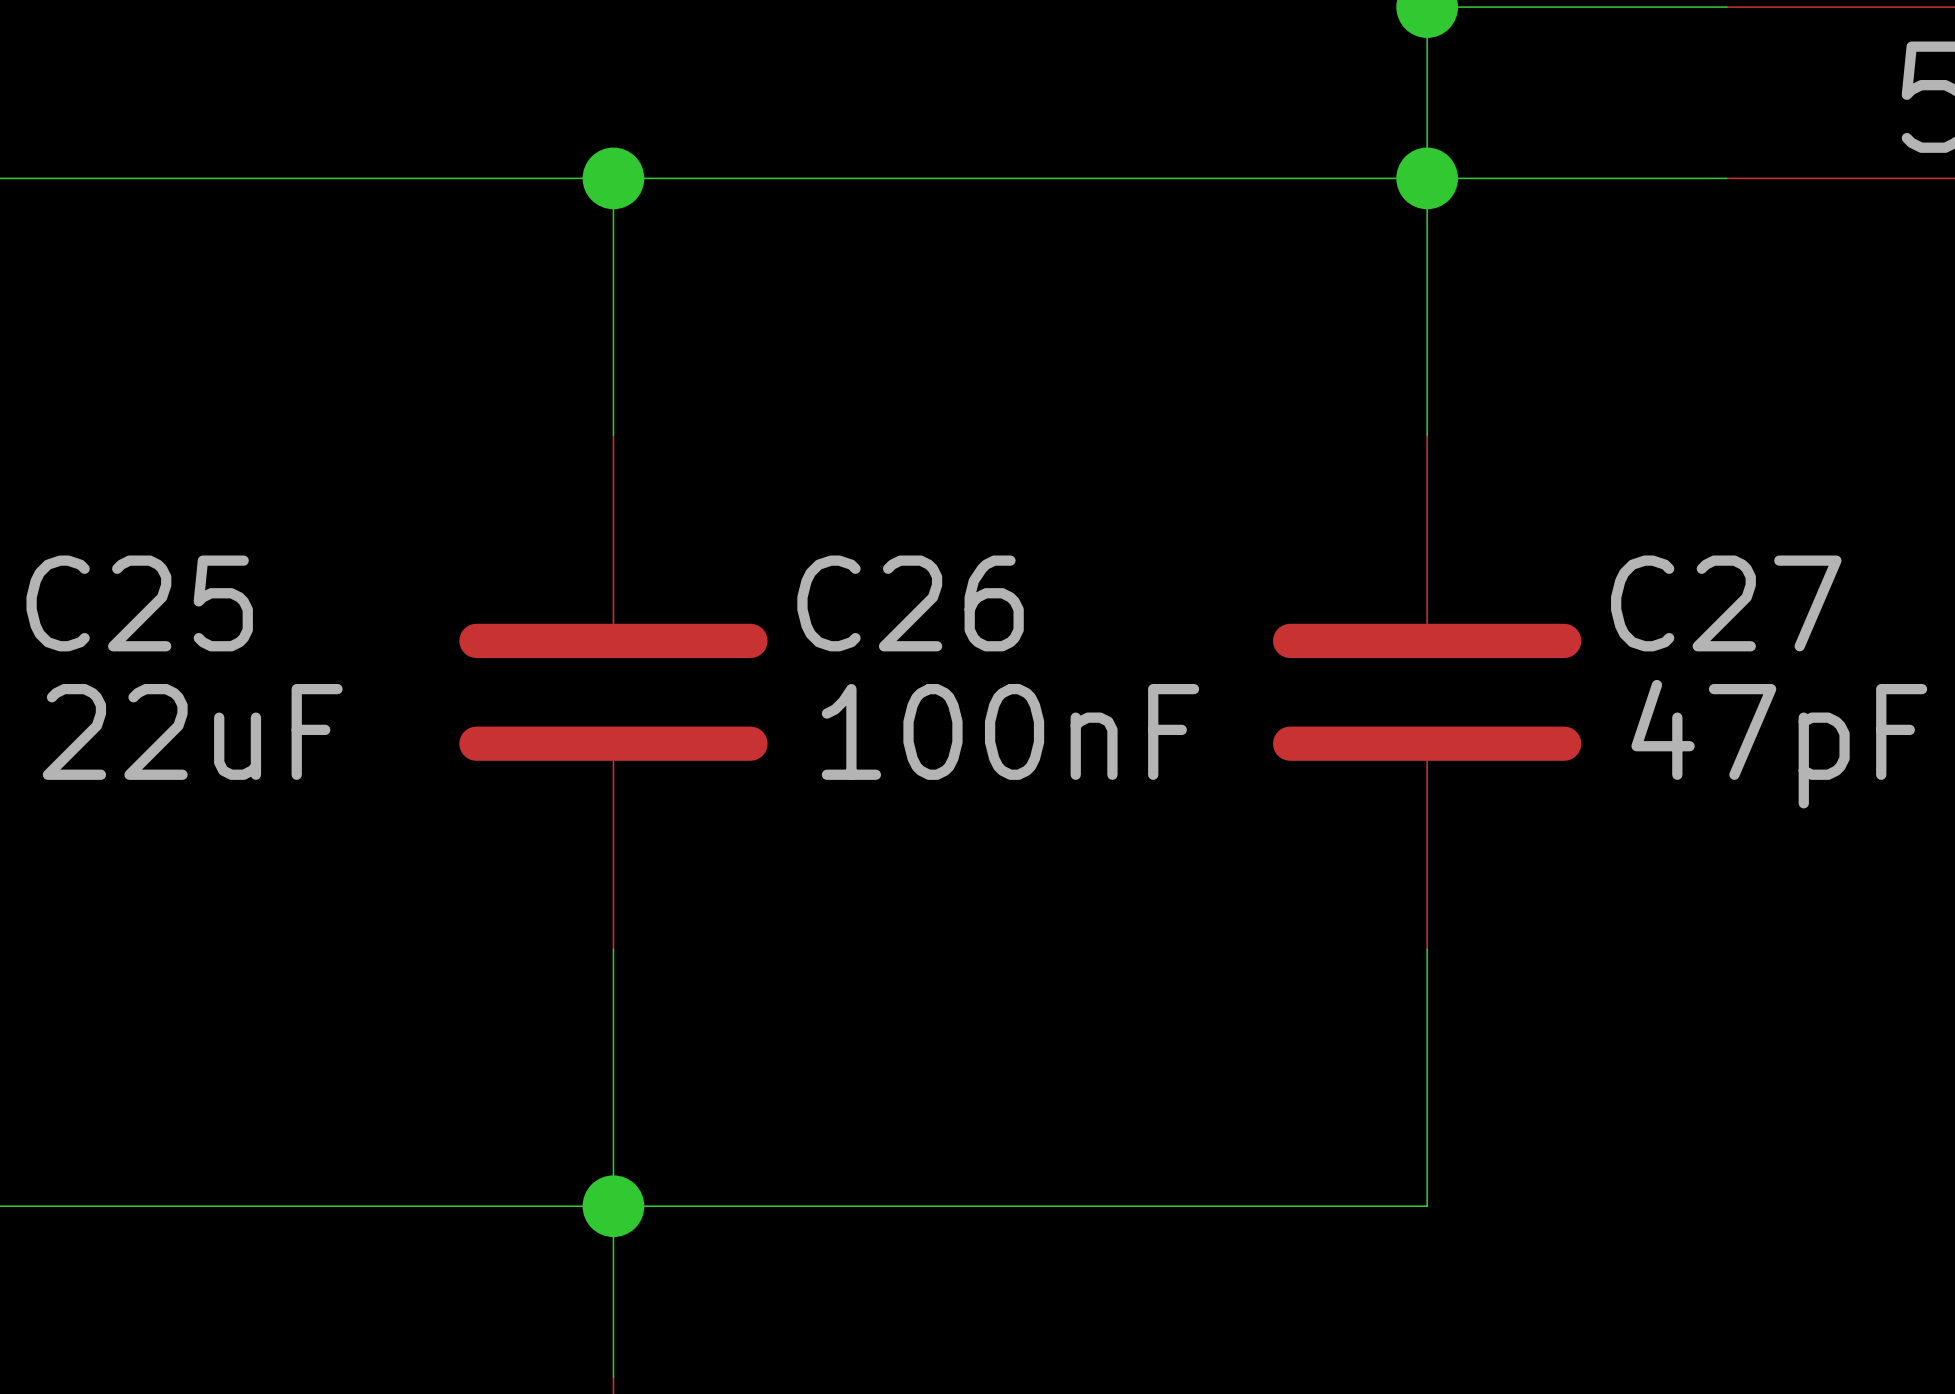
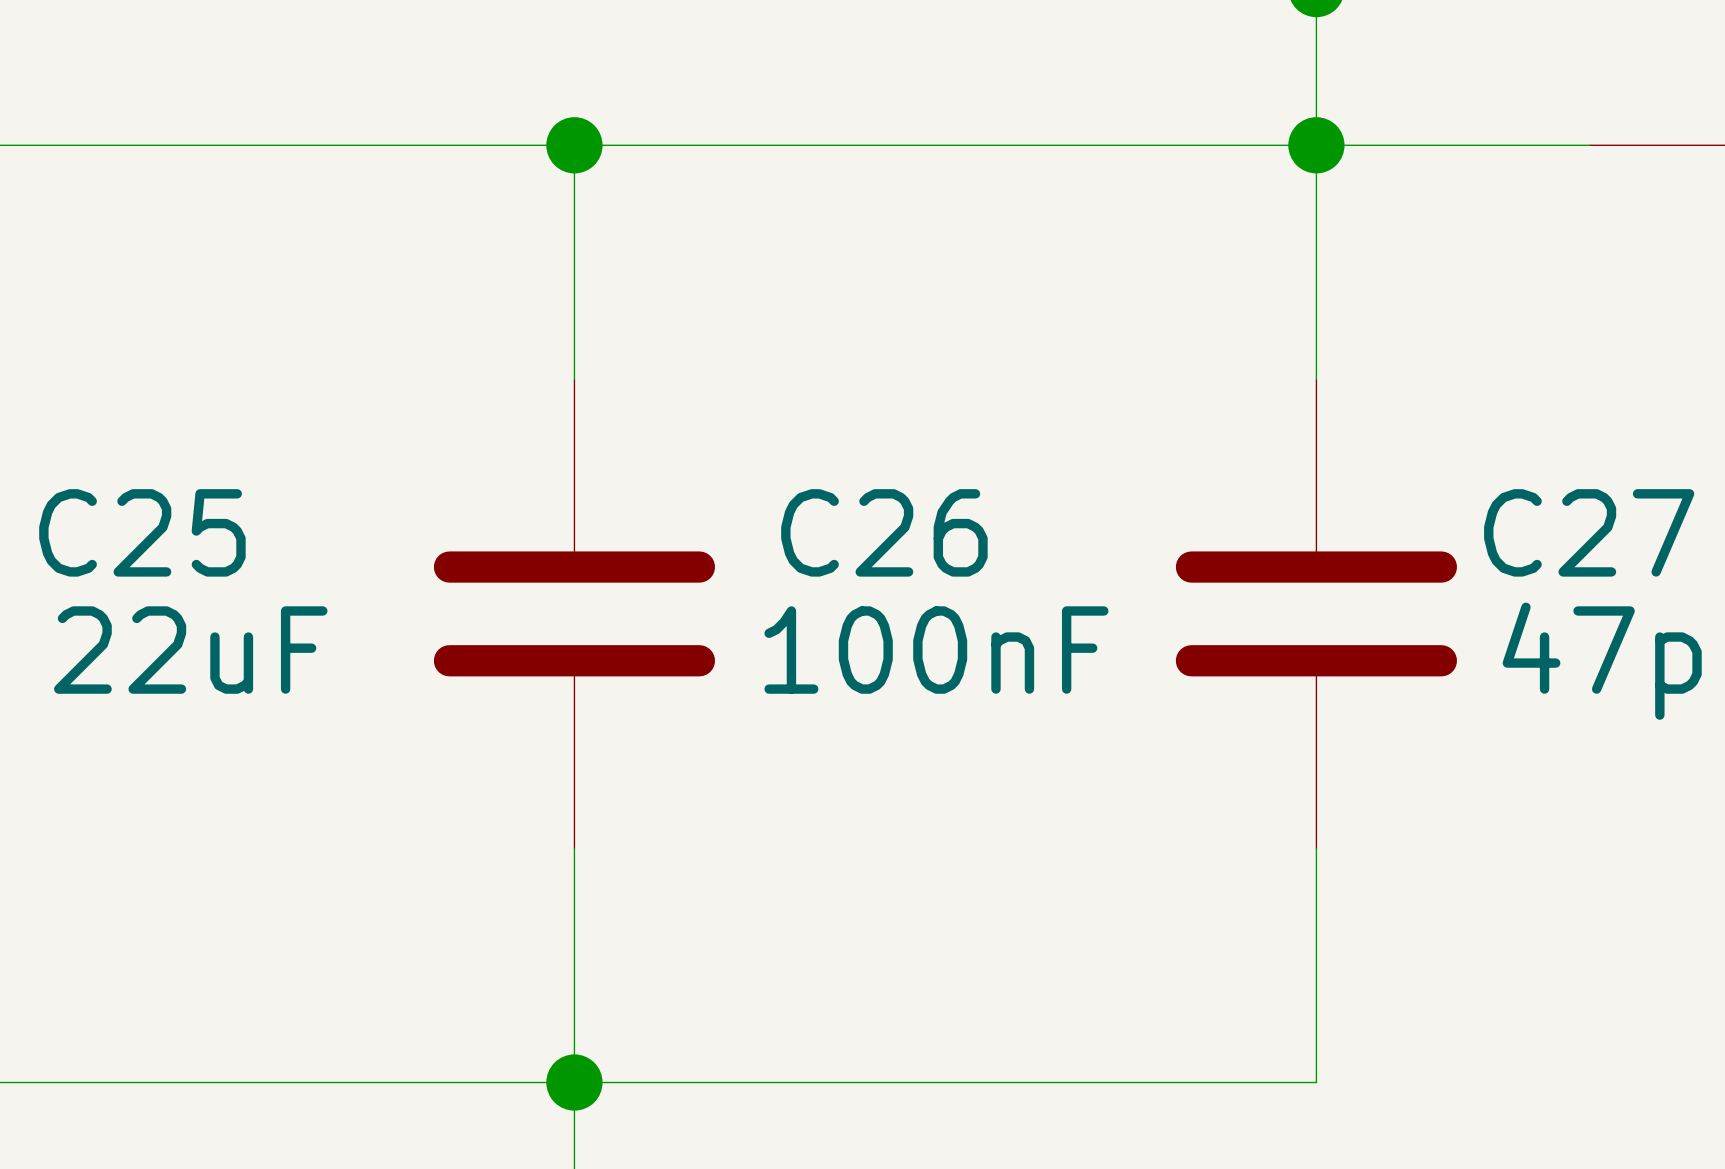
C26 name position: C26 (910, 603) -> C26 (884, 532)

